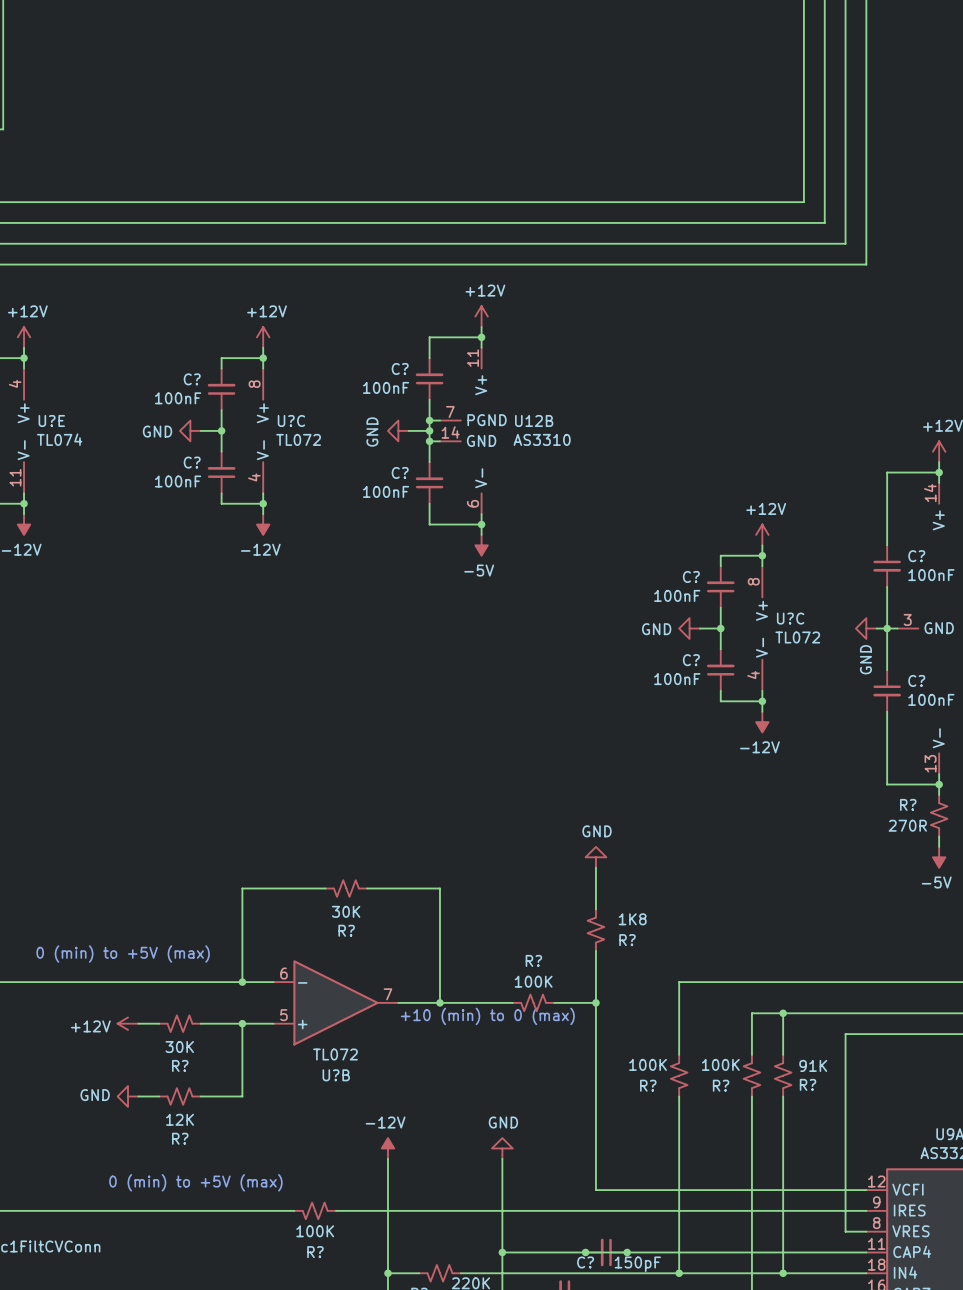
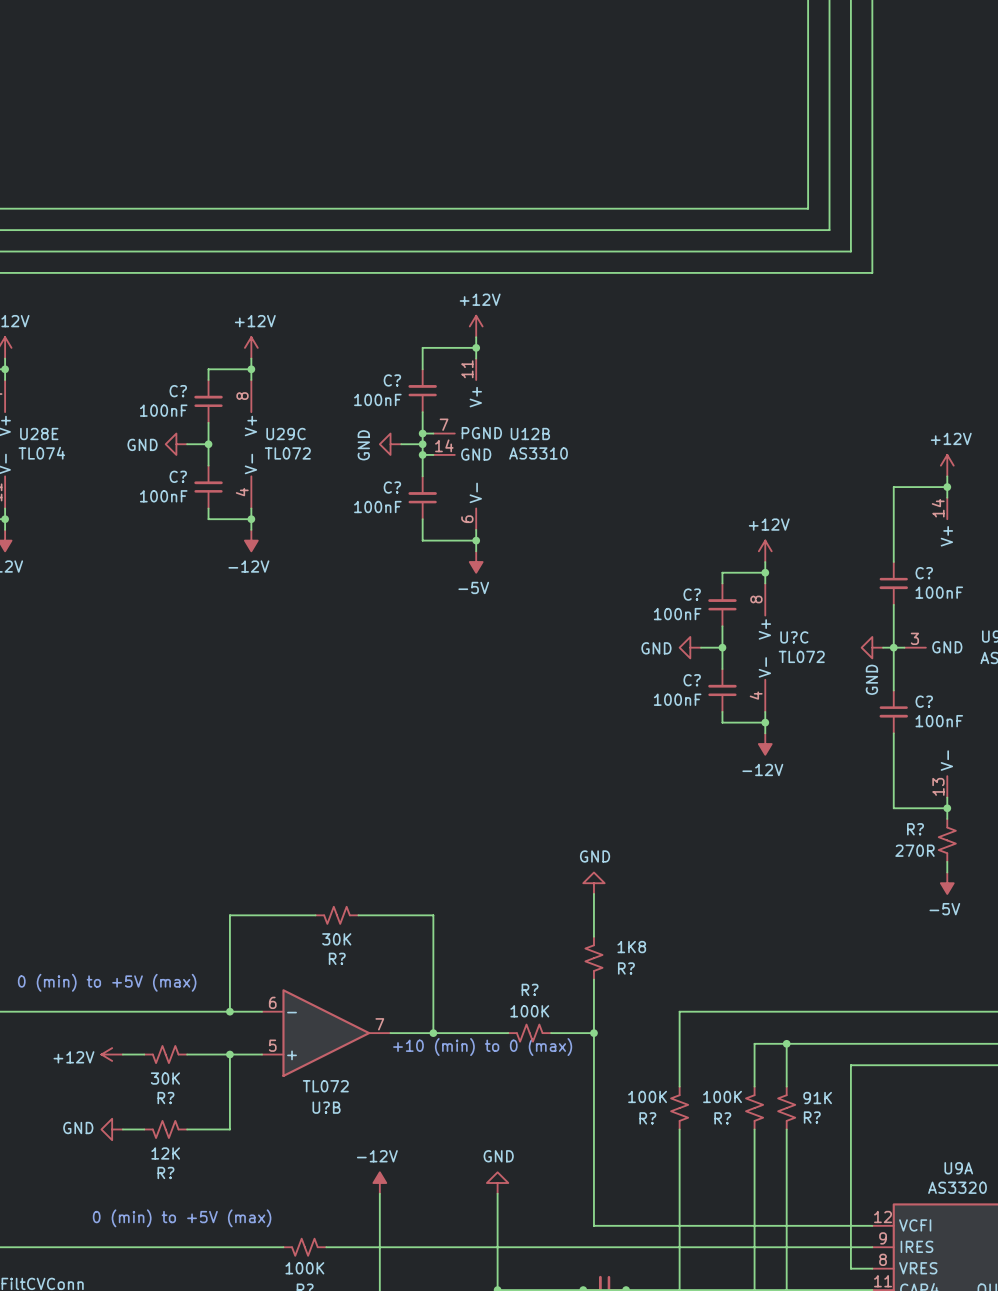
U?E name: U?E (51, 420) -> U28E (39, 433)
U?C name: U?C (291, 420) -> U29C (286, 433)

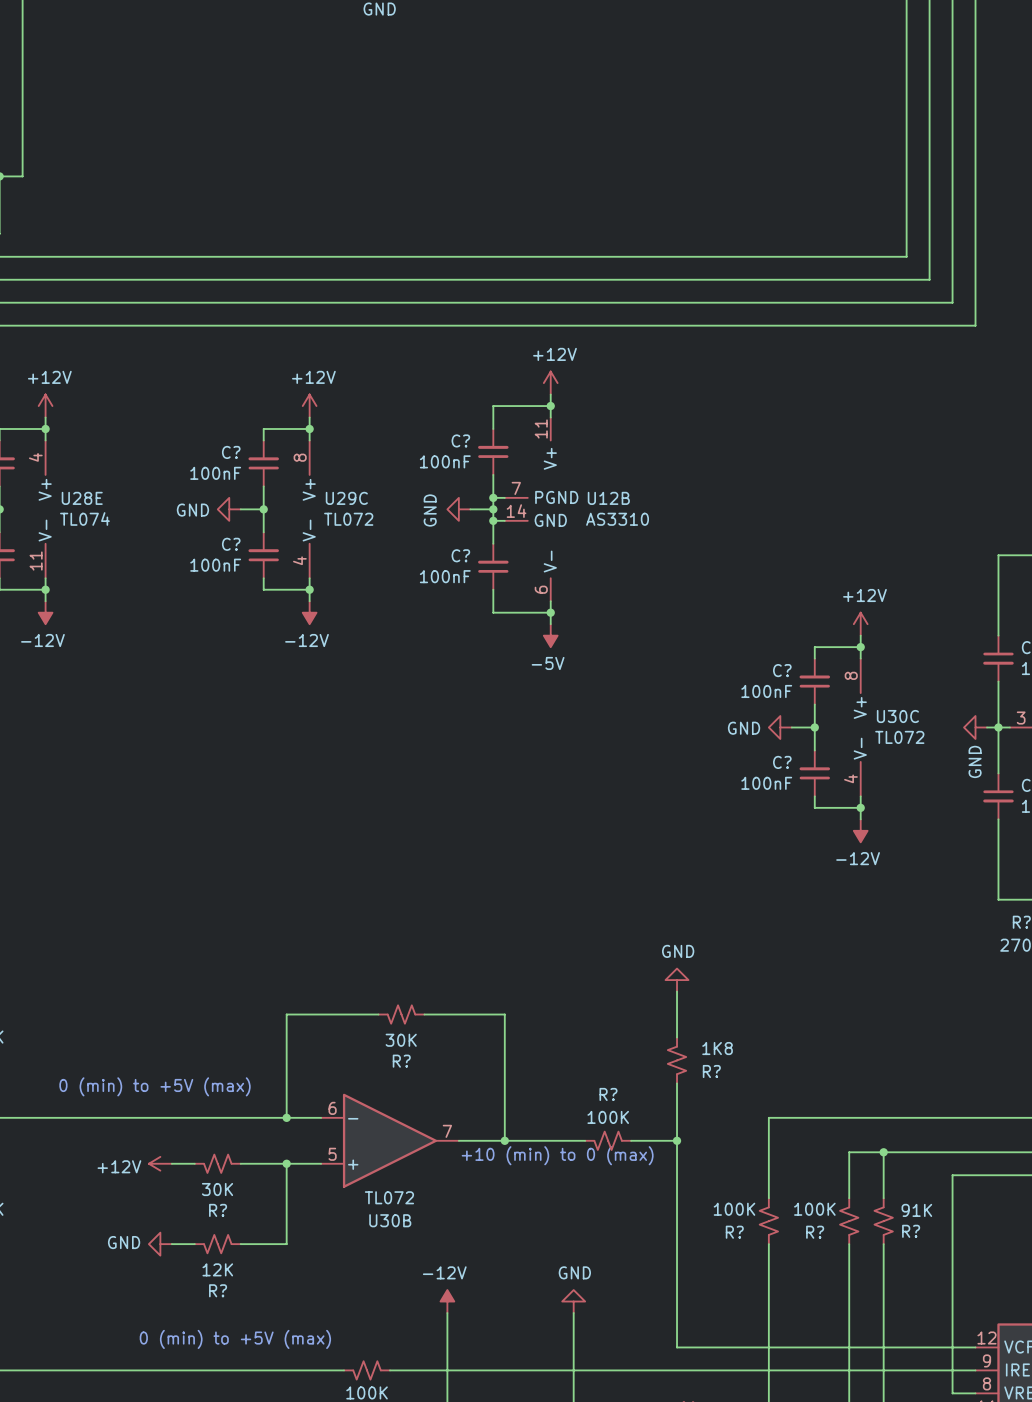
U?C name: U?C (794, 637) -> U30C (897, 716)
U?B name: U?B (326, 1107) -> U30B (390, 1220)

